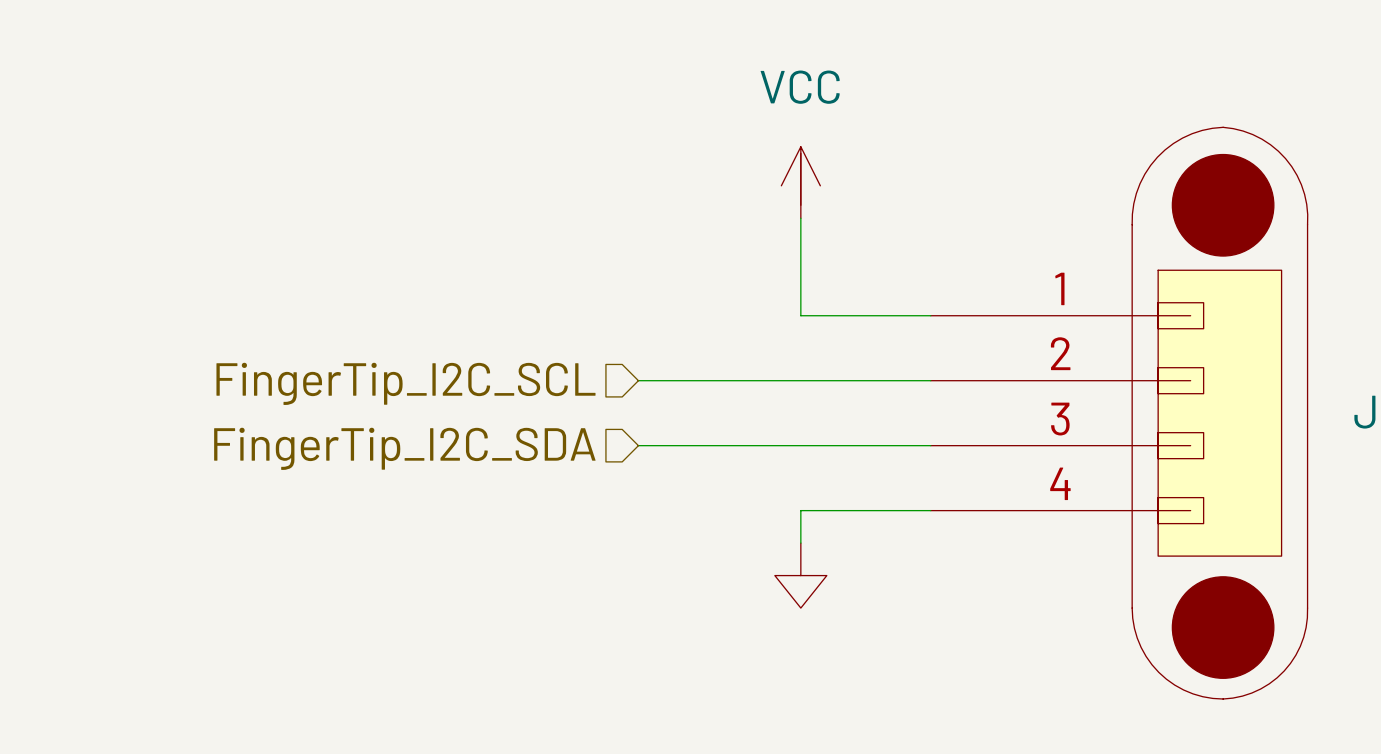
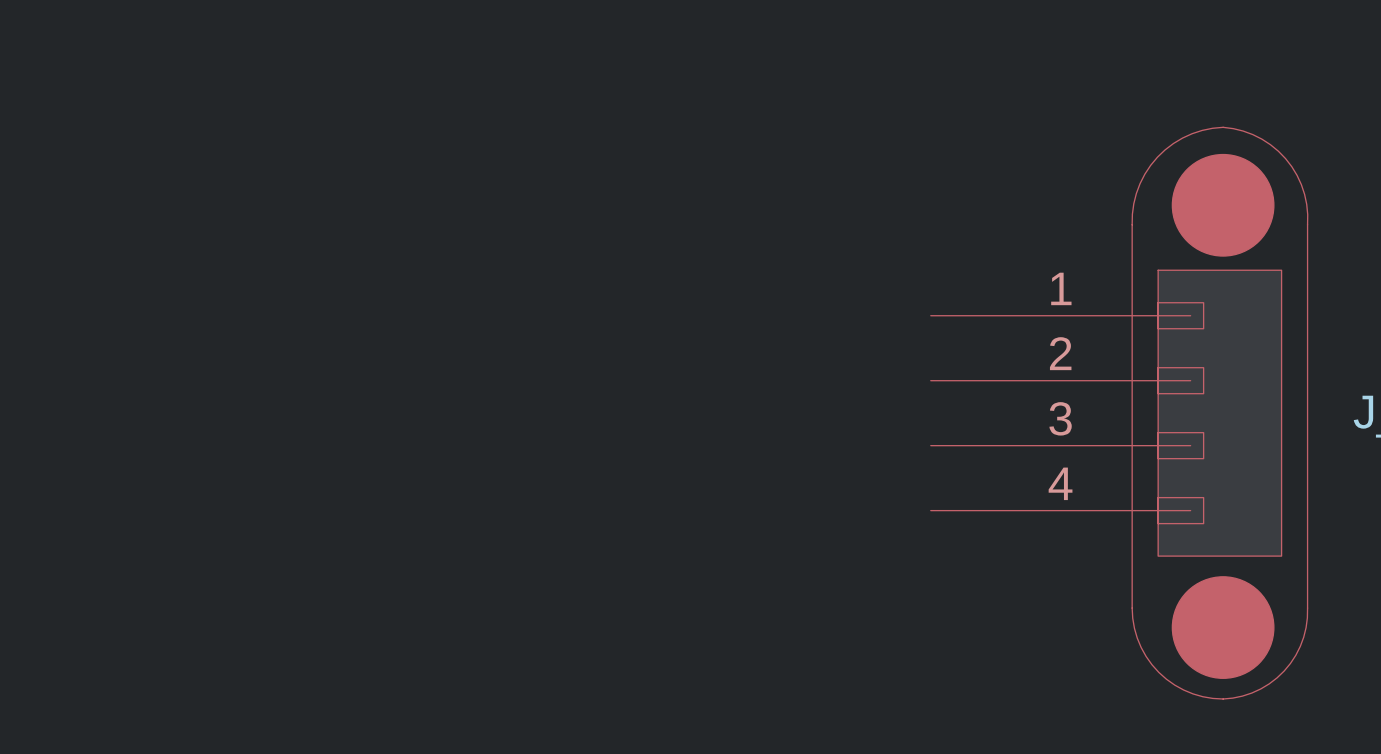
power symbol: VCC (800, 182) -> none
wire: (800, 218) (800, 315) (930, 315) -> none
wire: (638, 380) (930, 380) -> none
hierarchical label: FingerTip_I2C_SCL (405, 383) -> none
wire: (638, 445) (930, 445) -> none
hierarchical label: FingerTip_I2C_SDA (404, 448) -> none
wire: (930, 510) (800, 510) (800, 543) -> none
power symbol: (800, 575) -> none

